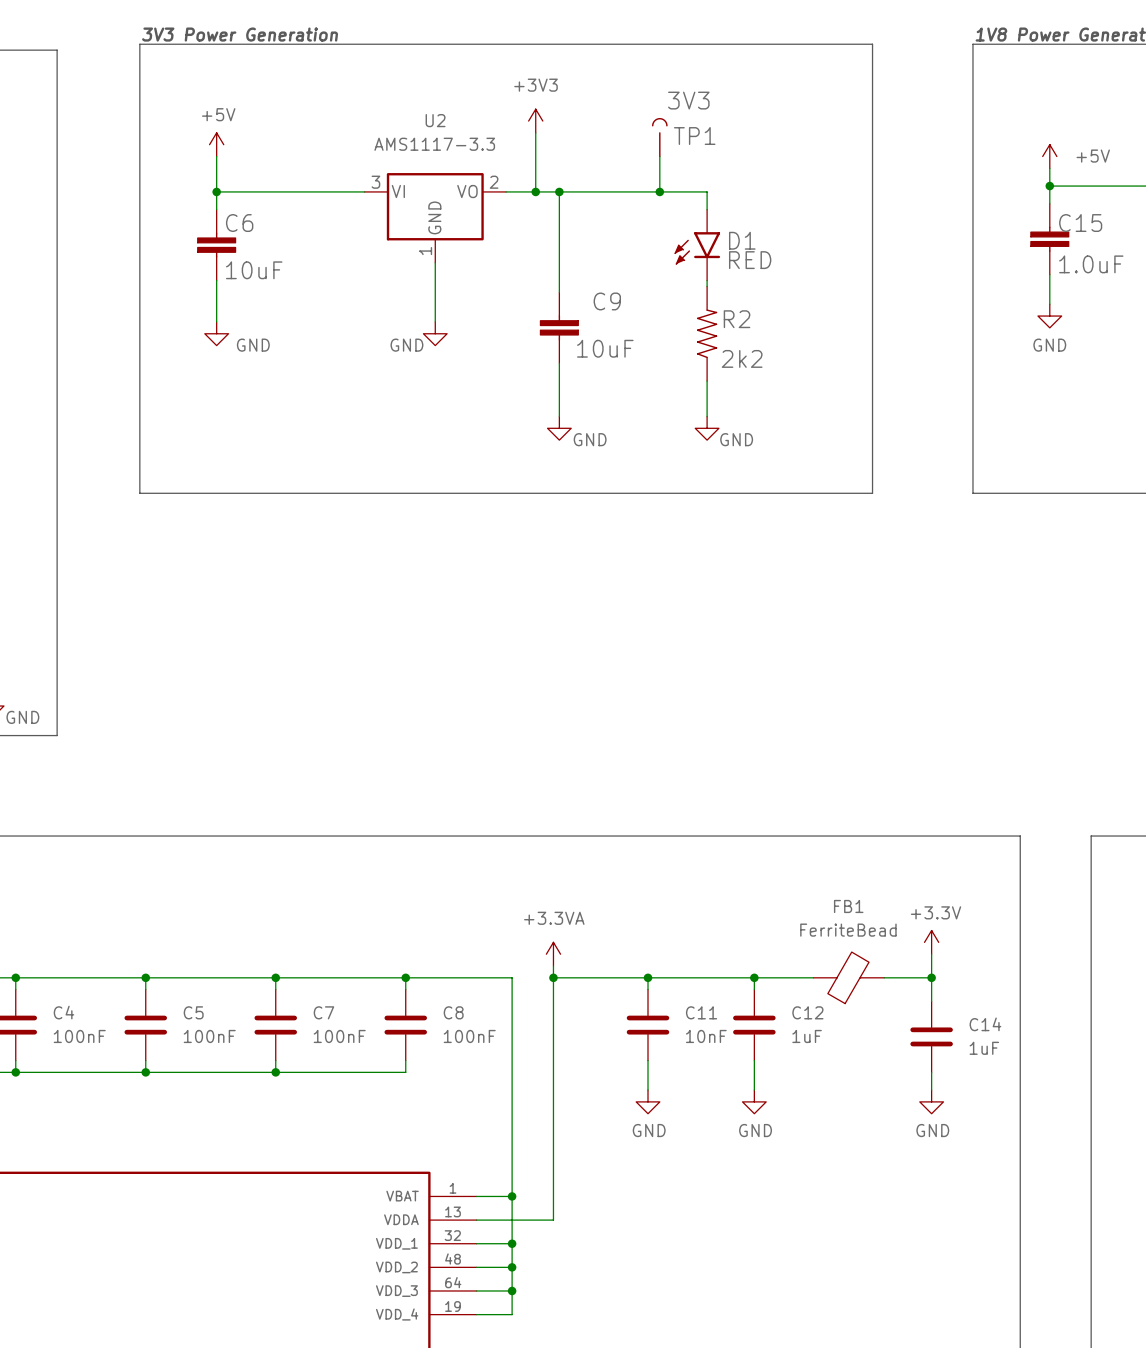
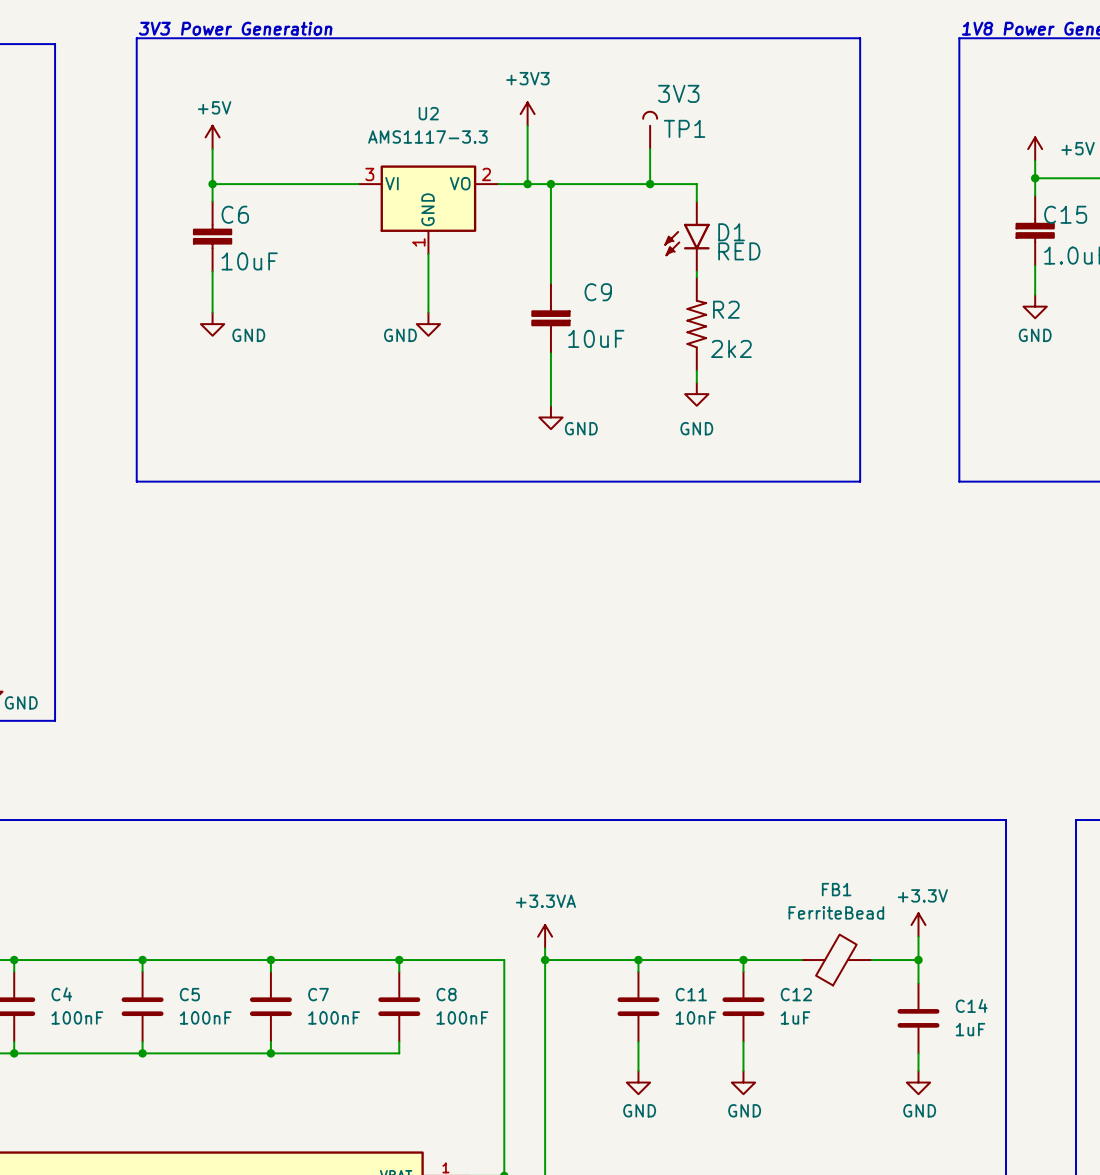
power symbol position: GND (707, 428) -> GND (696, 394)
power symbol text position: GND (736, 439) -> GND (696, 428)

